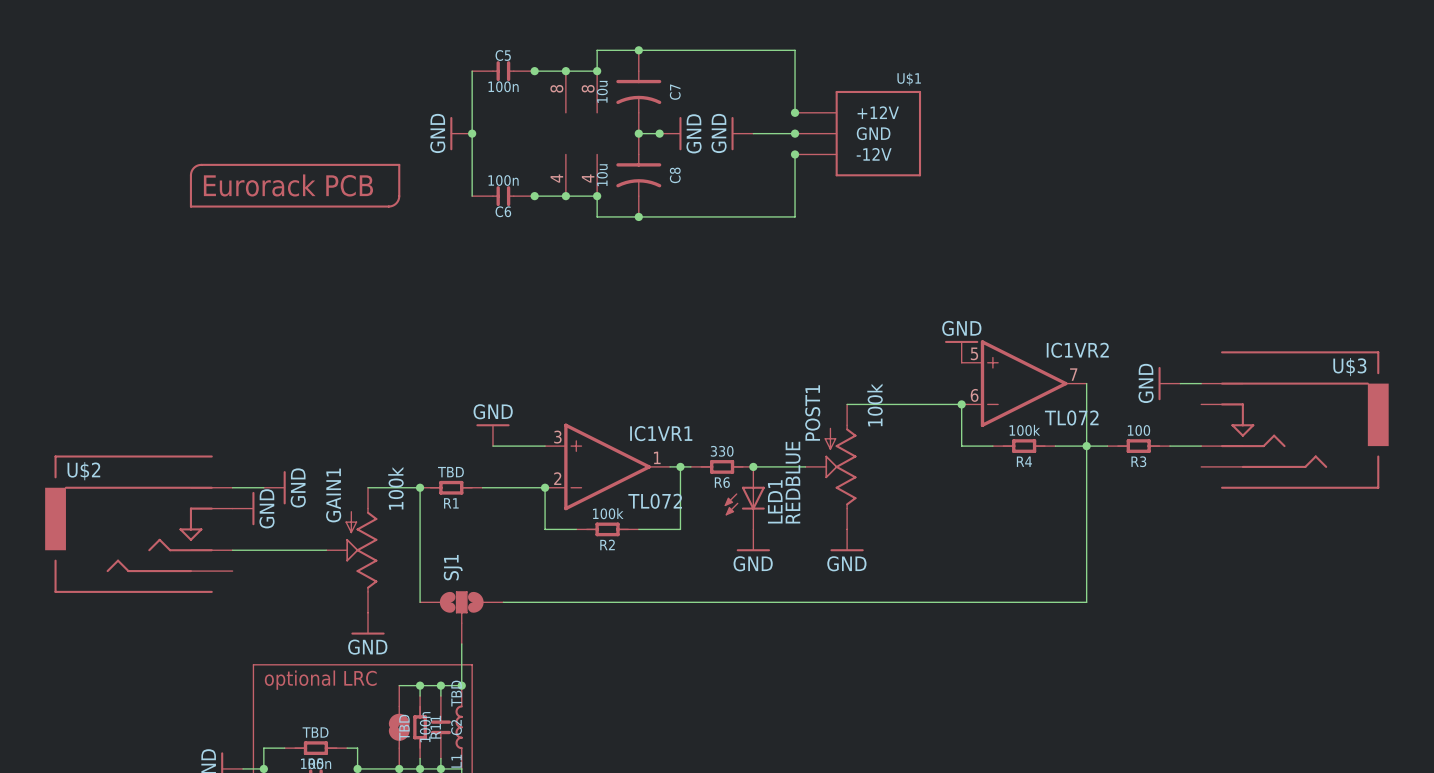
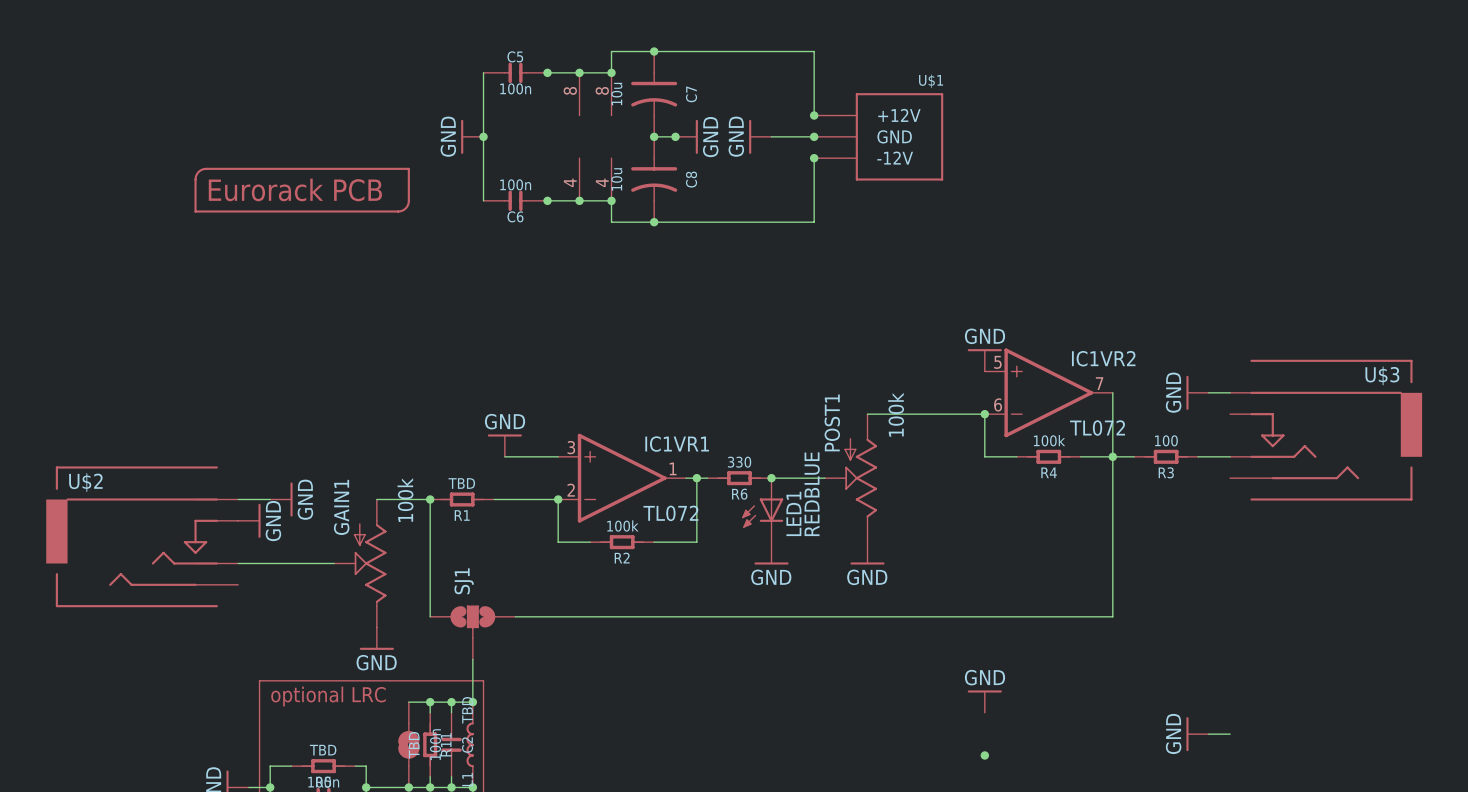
power symbol: none -> GND (984, 701)
power symbol: none -> GND (1197, 734)
wire: none -> (1208, 734) (1230, 734)
junction: none -> (984, 755)
junction: none -> (472, 787)

